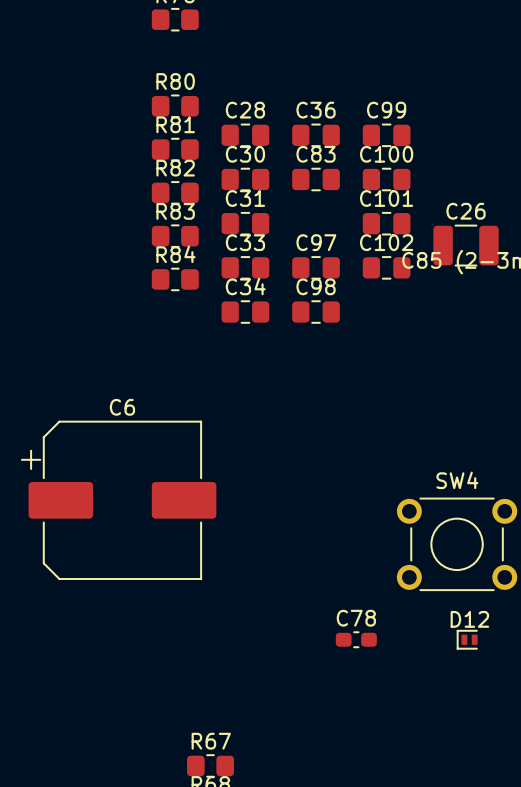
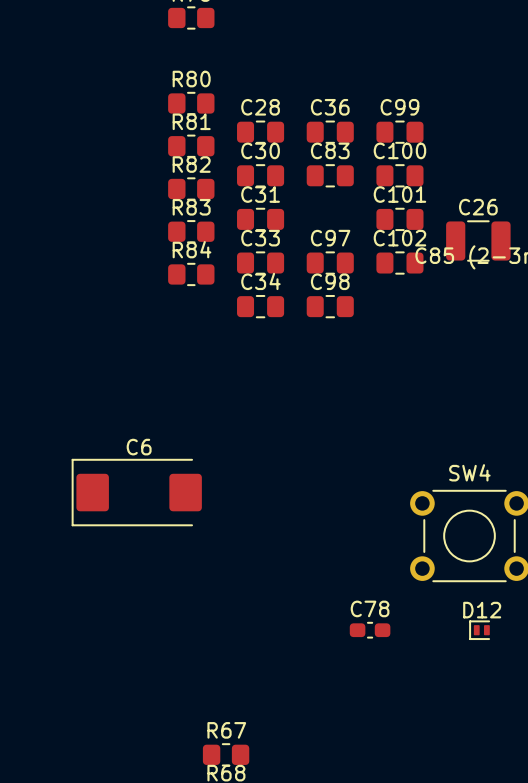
C6 name position: C6 (122, 407) -> C6 (139, 447)
C6 footprint: [21, 420, 217, 580] -> [71, 458, 202, 527]

